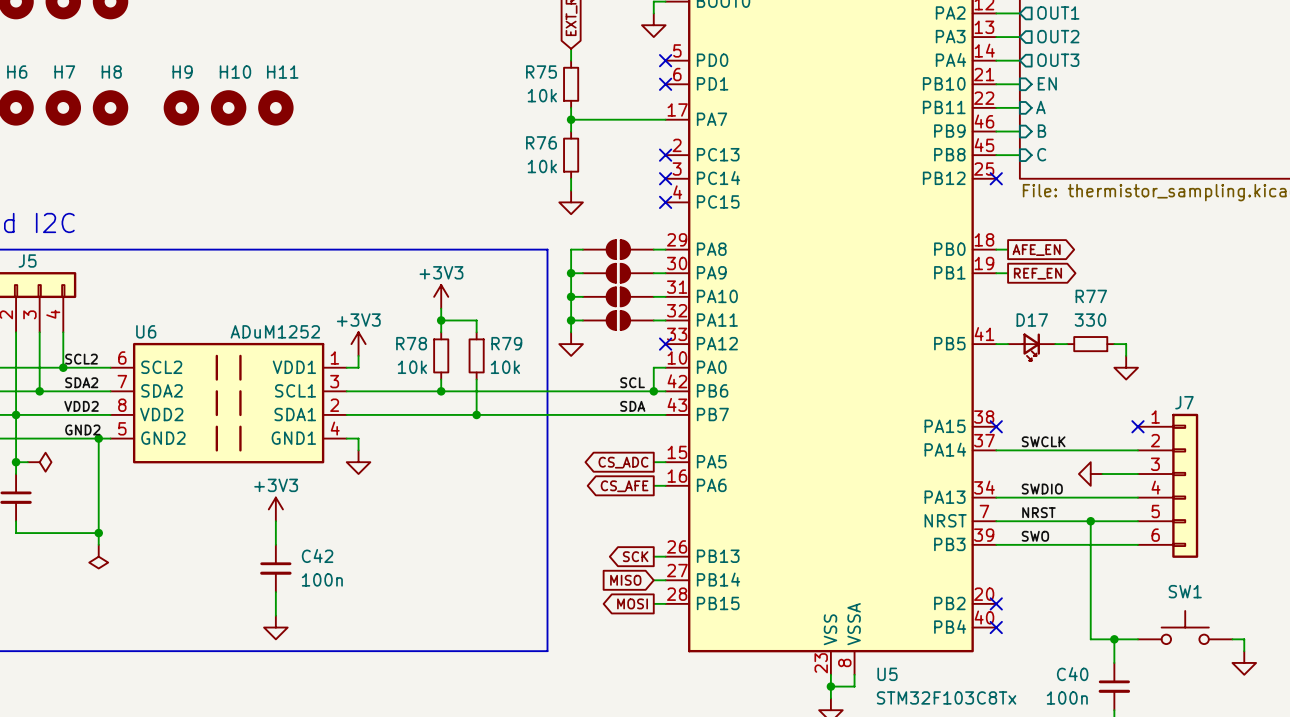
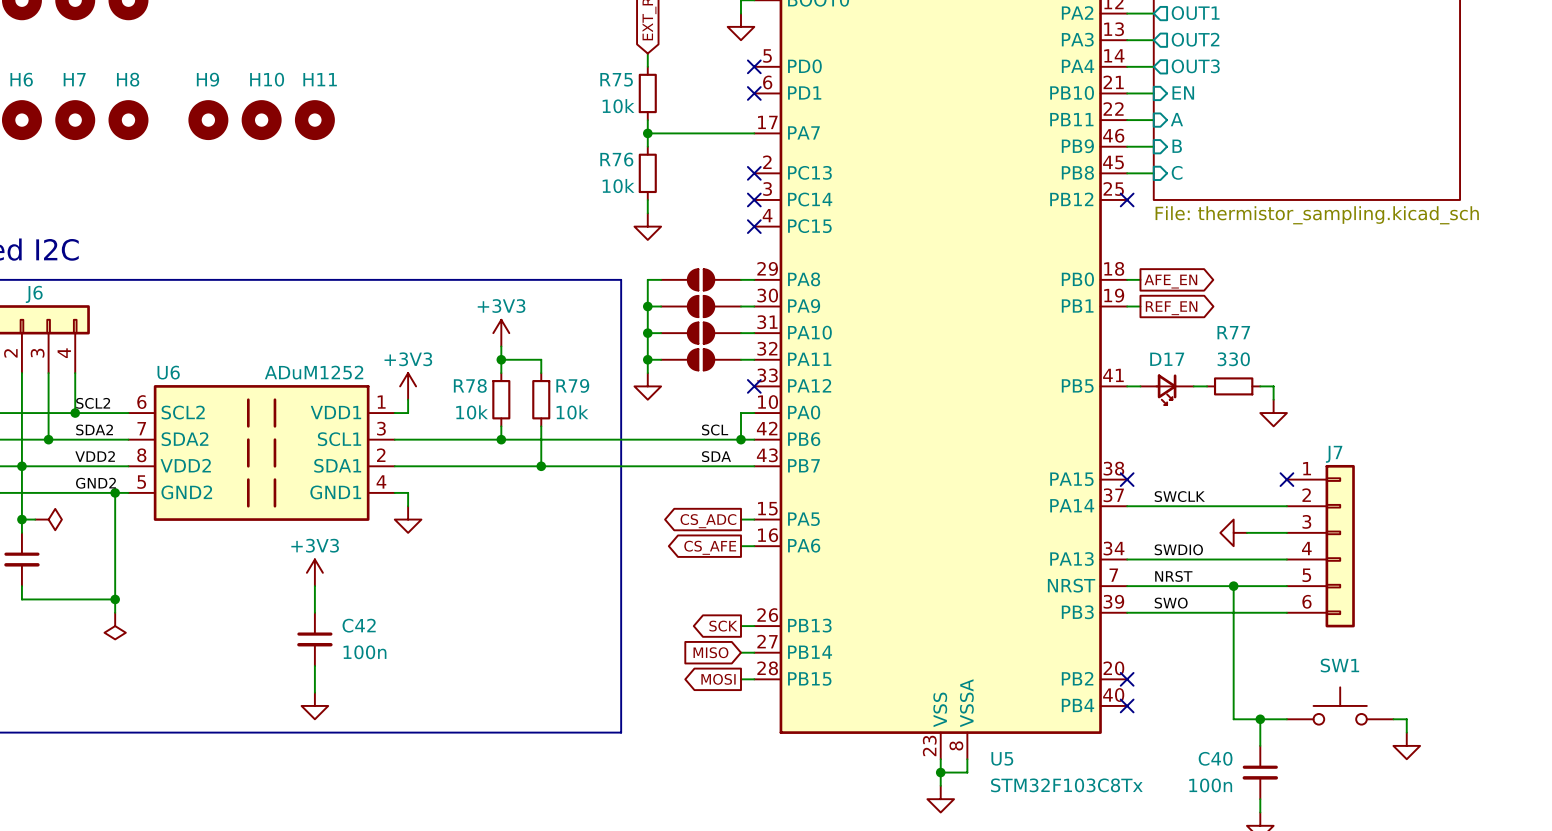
J5 name: J5 (27, 260) -> J6 (34, 294)

